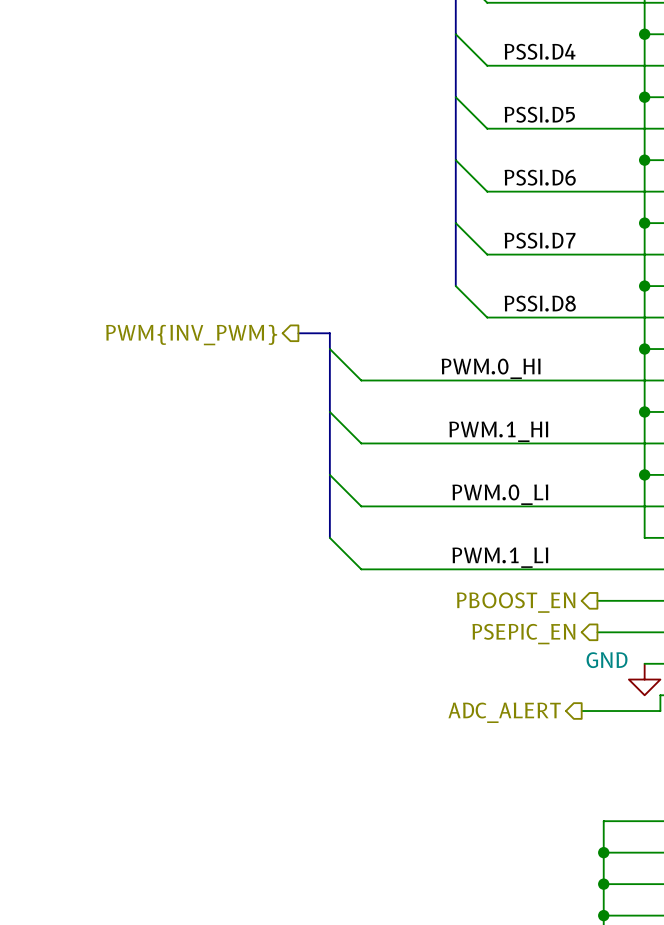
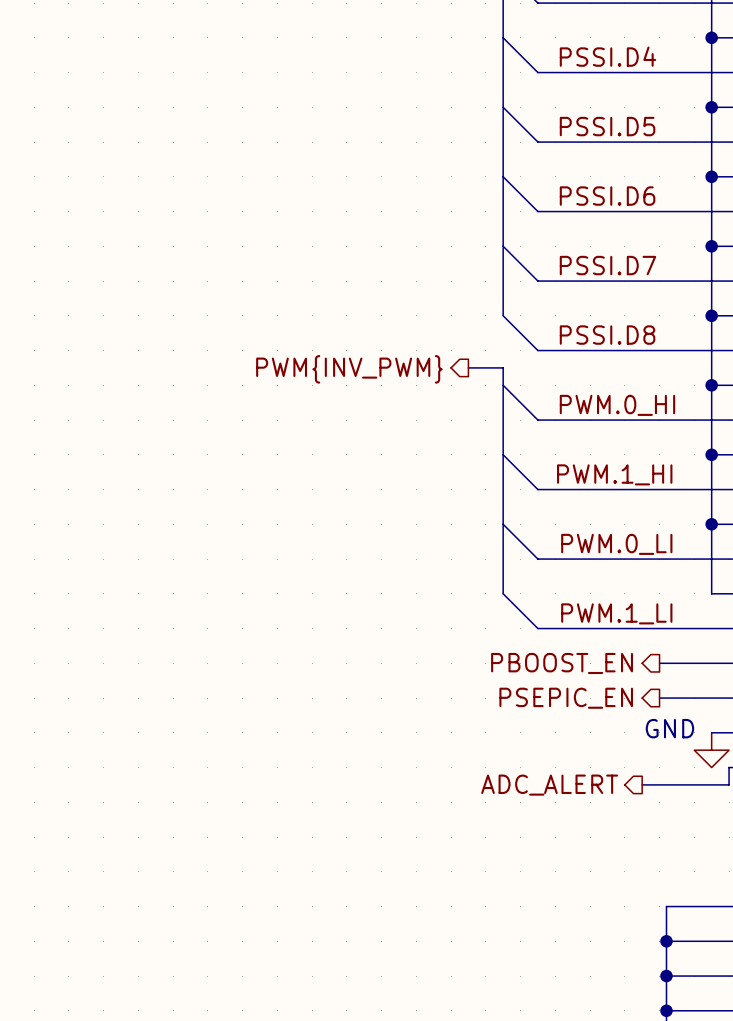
bus: (298, 333) (329, 333) (329, 537) -> (468, 367) (503, 367) (503, 593)
hierarchical label position: PWM{INV_PWM} (191, 335) -> PWM{INV_PWM} (349, 369)
wire: (329, 349) (361, 380) (487, 380) -> (503, 385) (537, 420)
label position: PWM.0_HI (491, 368) -> PWM.0_HI (617, 405)
wire: (329, 411) (361, 443) (487, 443) -> (503, 454) (537, 489)
label position: PWM.1_HI (498, 431) -> PWM.1_HI (614, 474)
wire: (329, 474) (361, 506) (487, 506) -> (503, 524) (537, 559)
label position: PWM.0_LI (500, 494) -> PWM.0_LI (616, 544)
wire: (329, 537) (361, 569) (487, 569) -> (503, 593) (537, 628)
label position: PWM.1_LI (500, 557) -> PWM.1_LI (616, 613)

